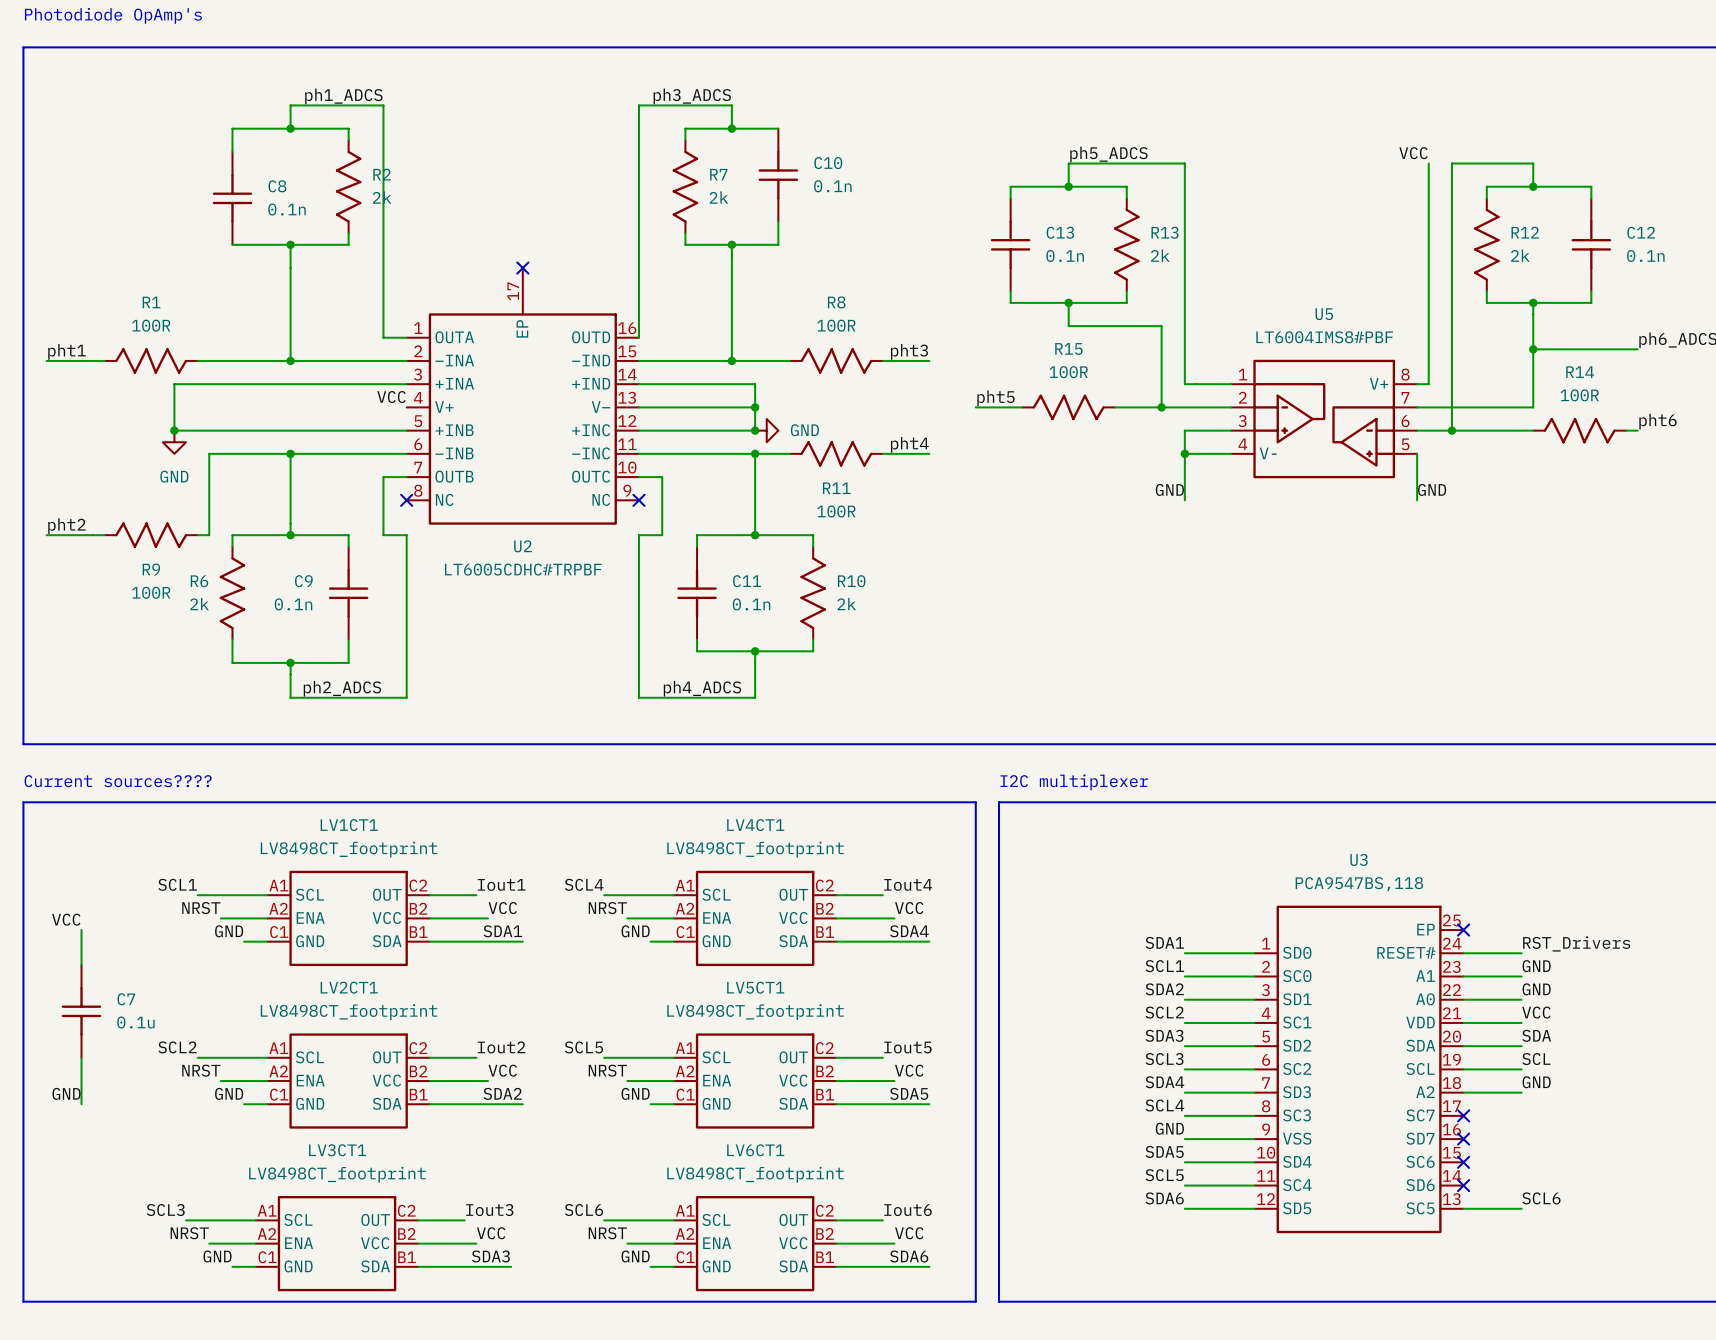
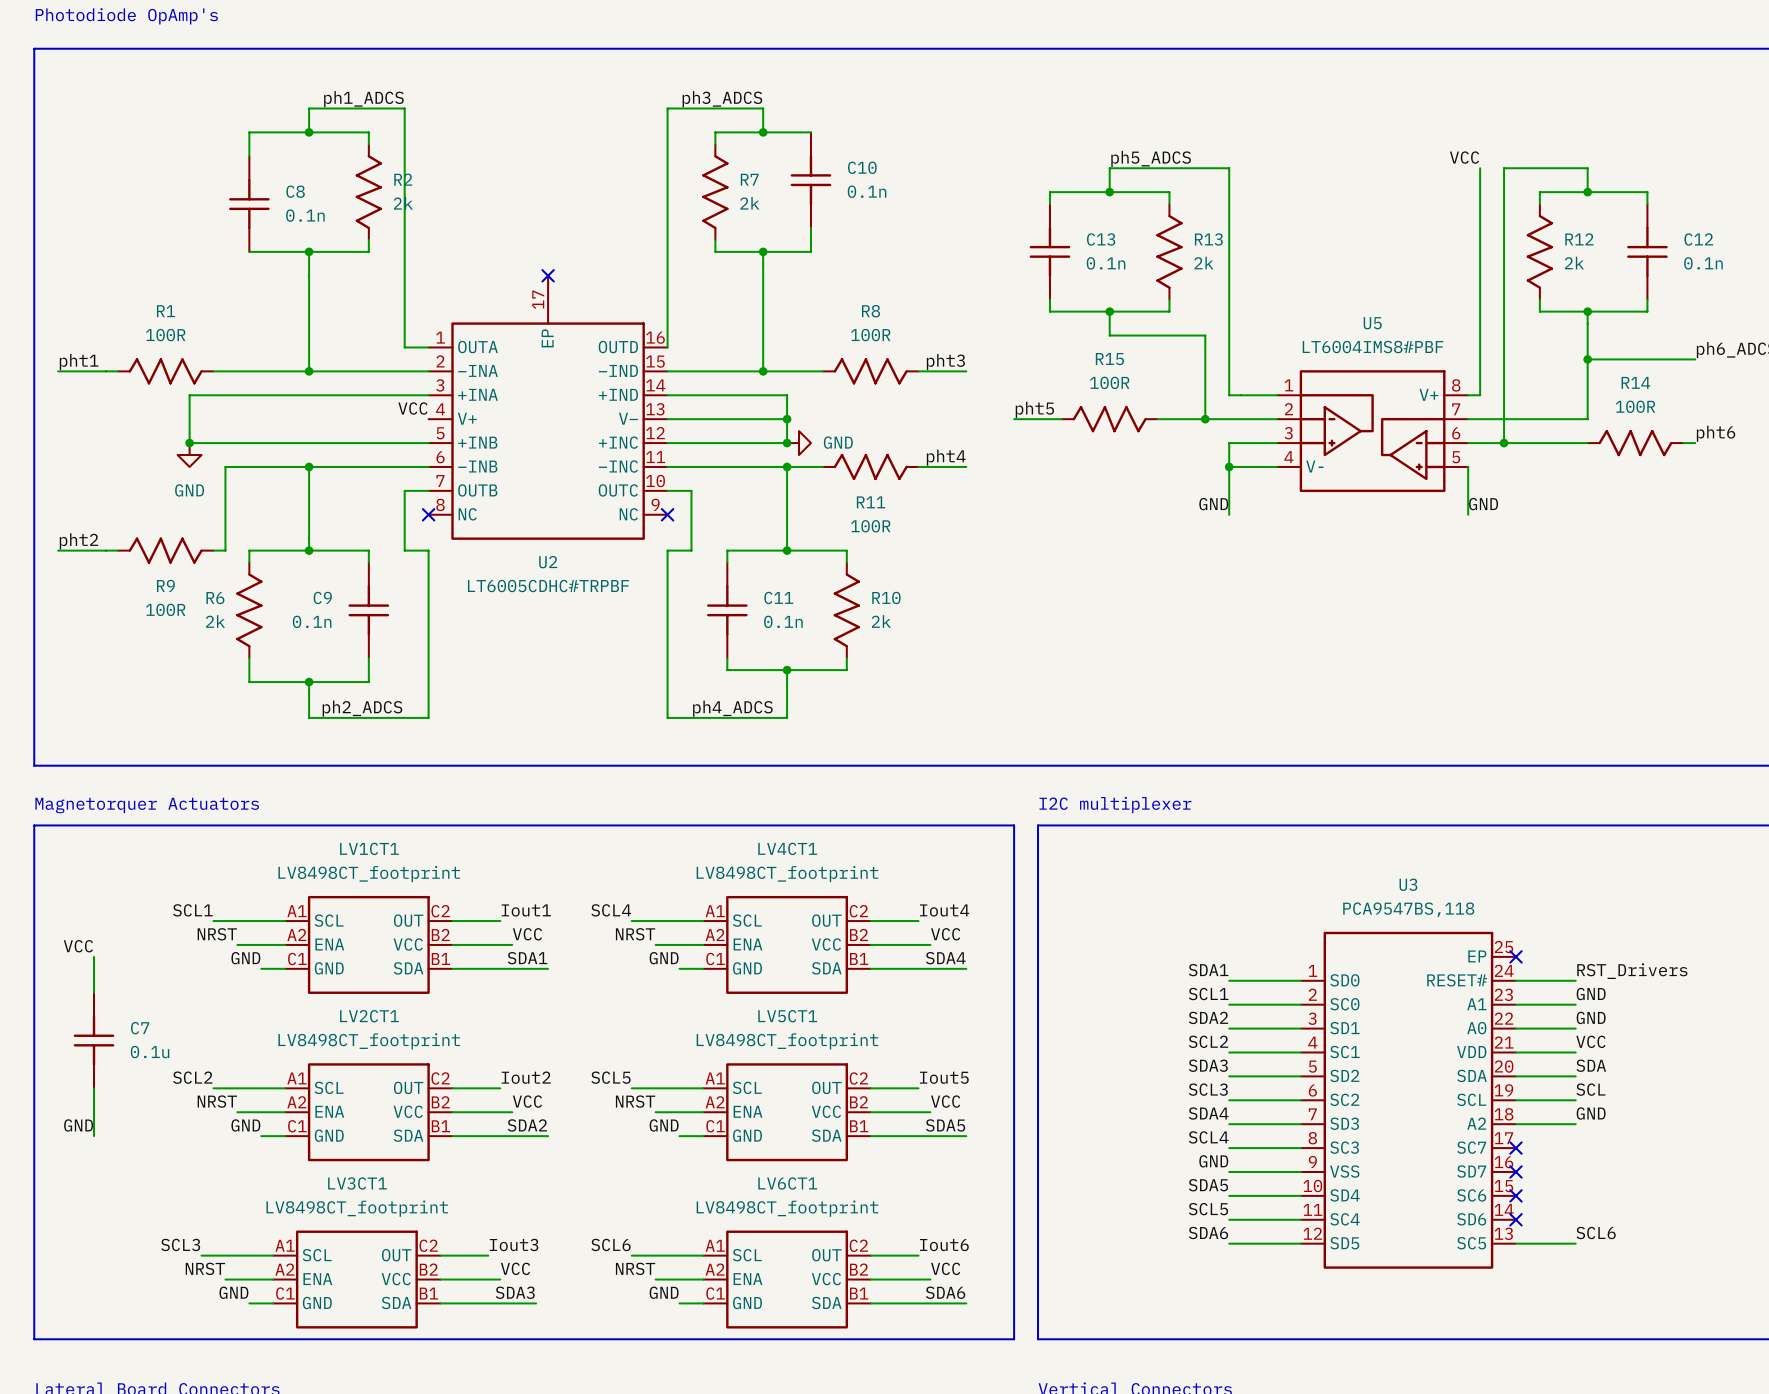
text: Current sources???? (118, 781) -> Magnetorquer Actuators (147, 805)

